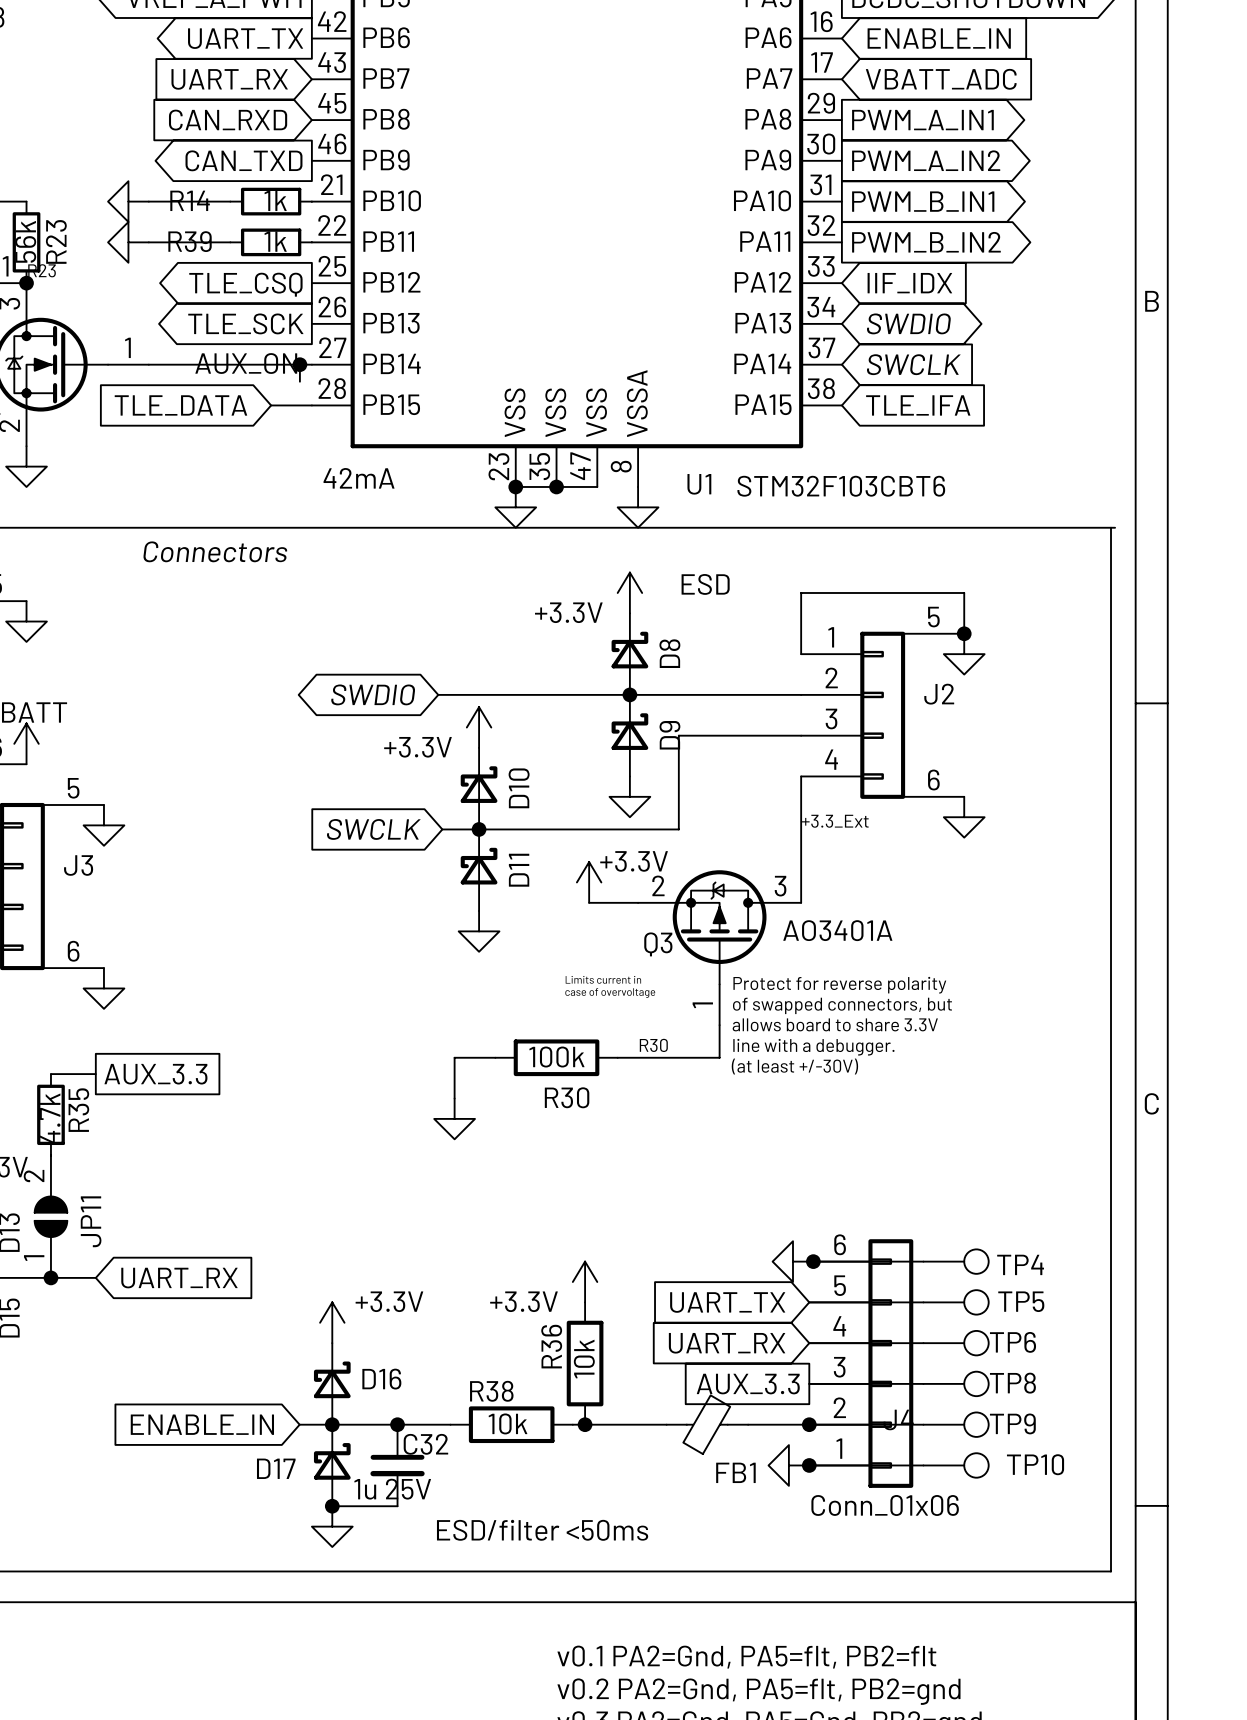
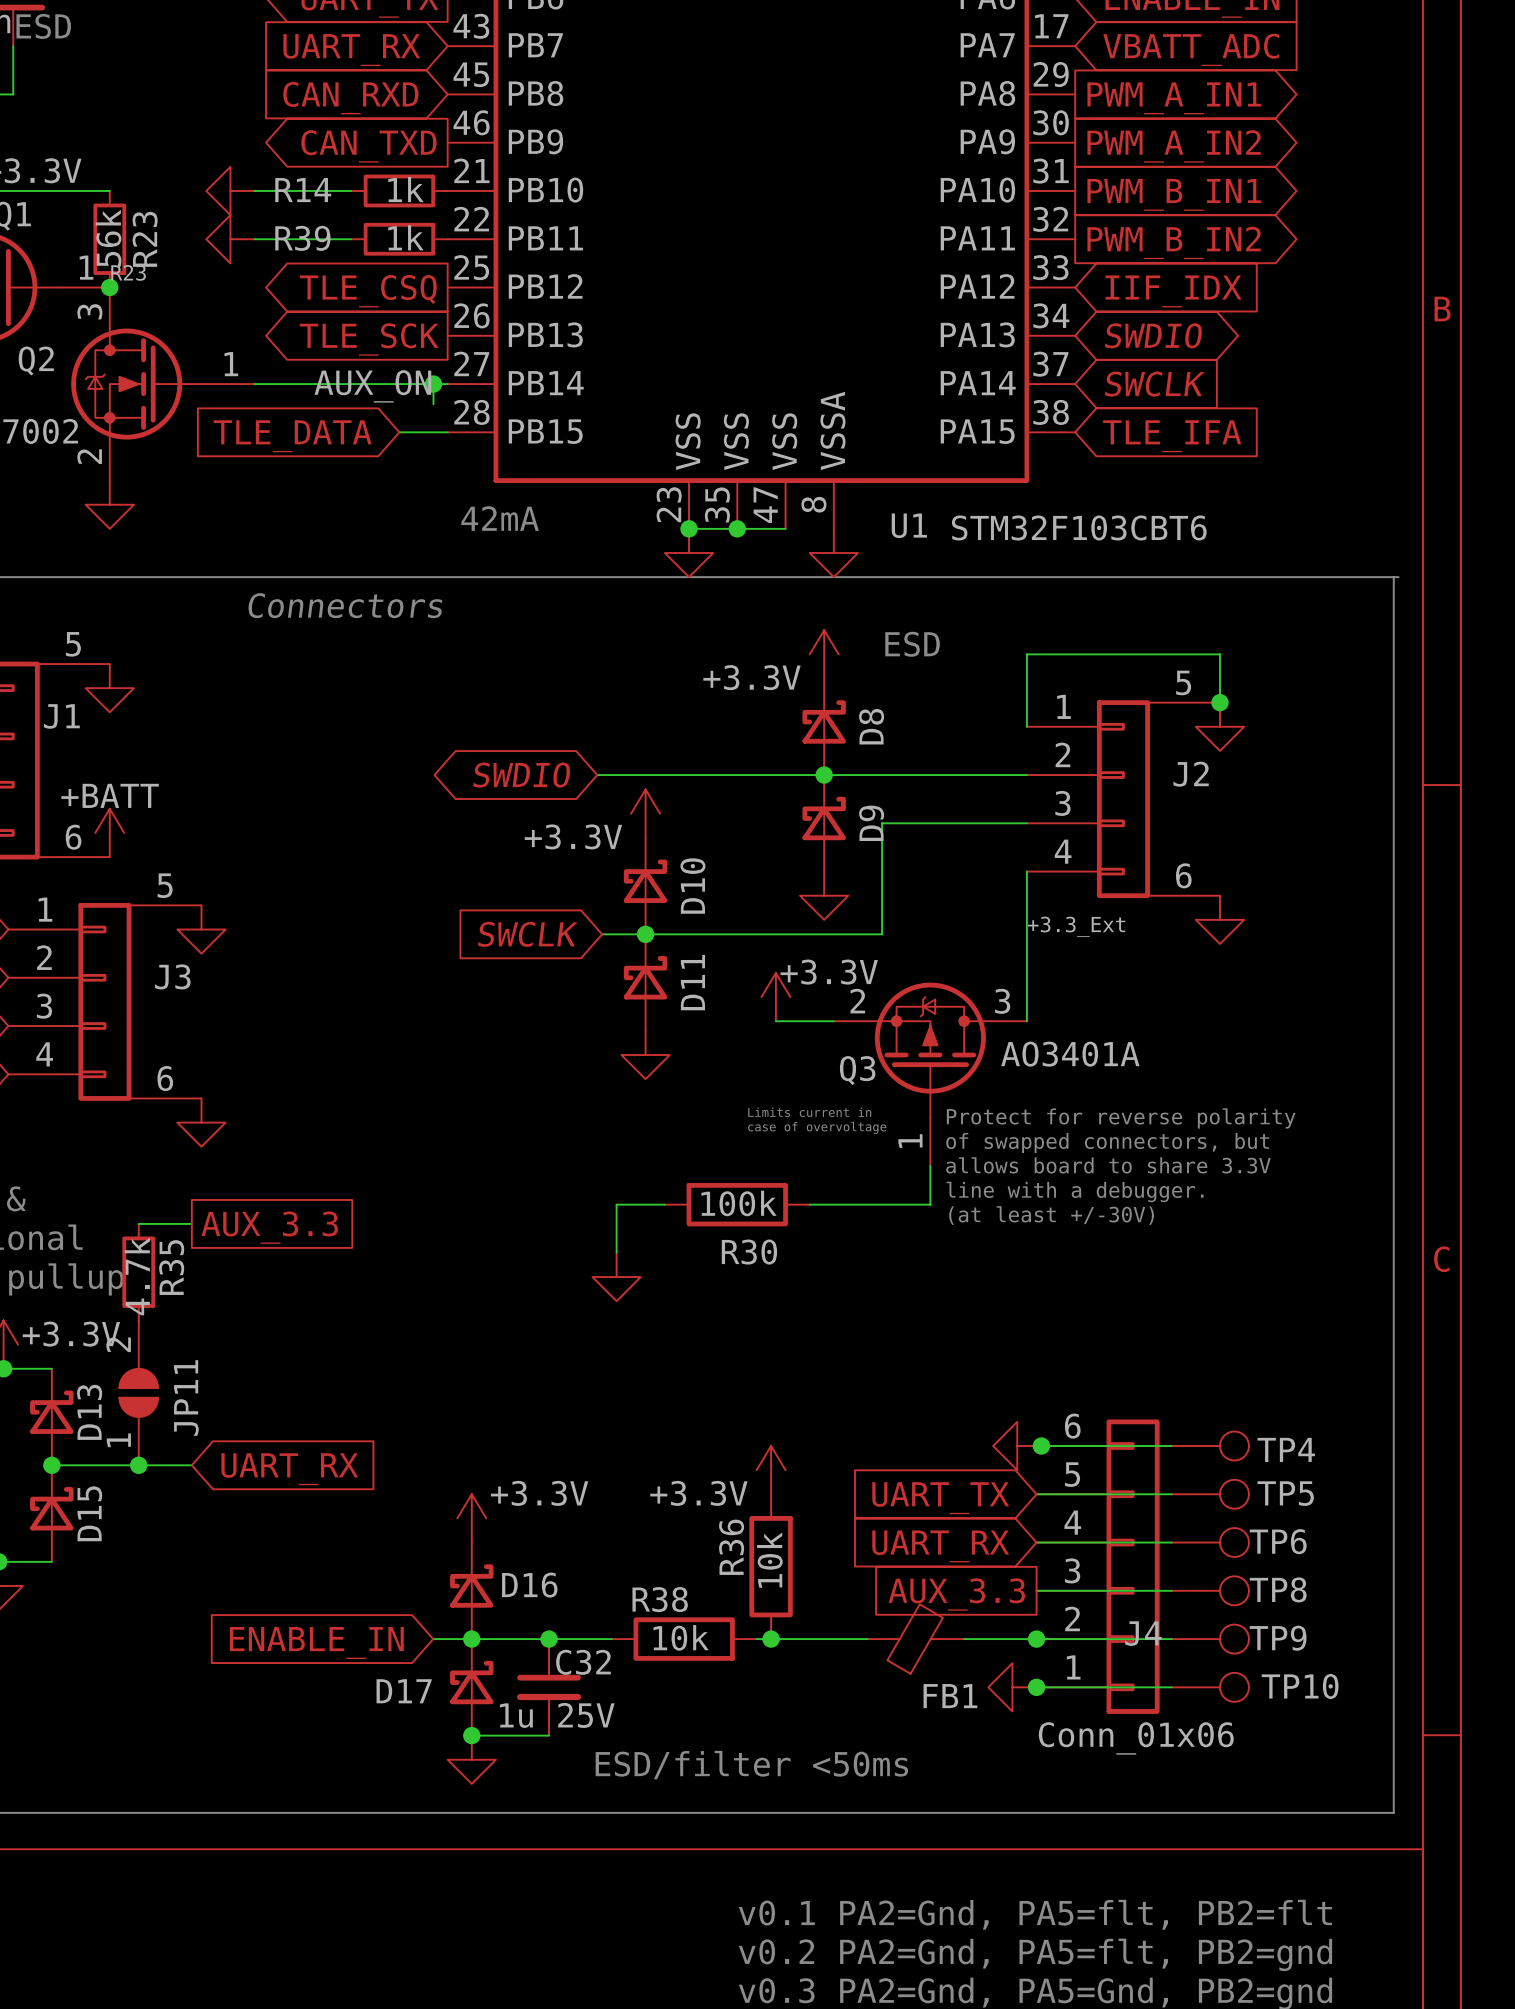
label: R30 (653, 1045) -> none

